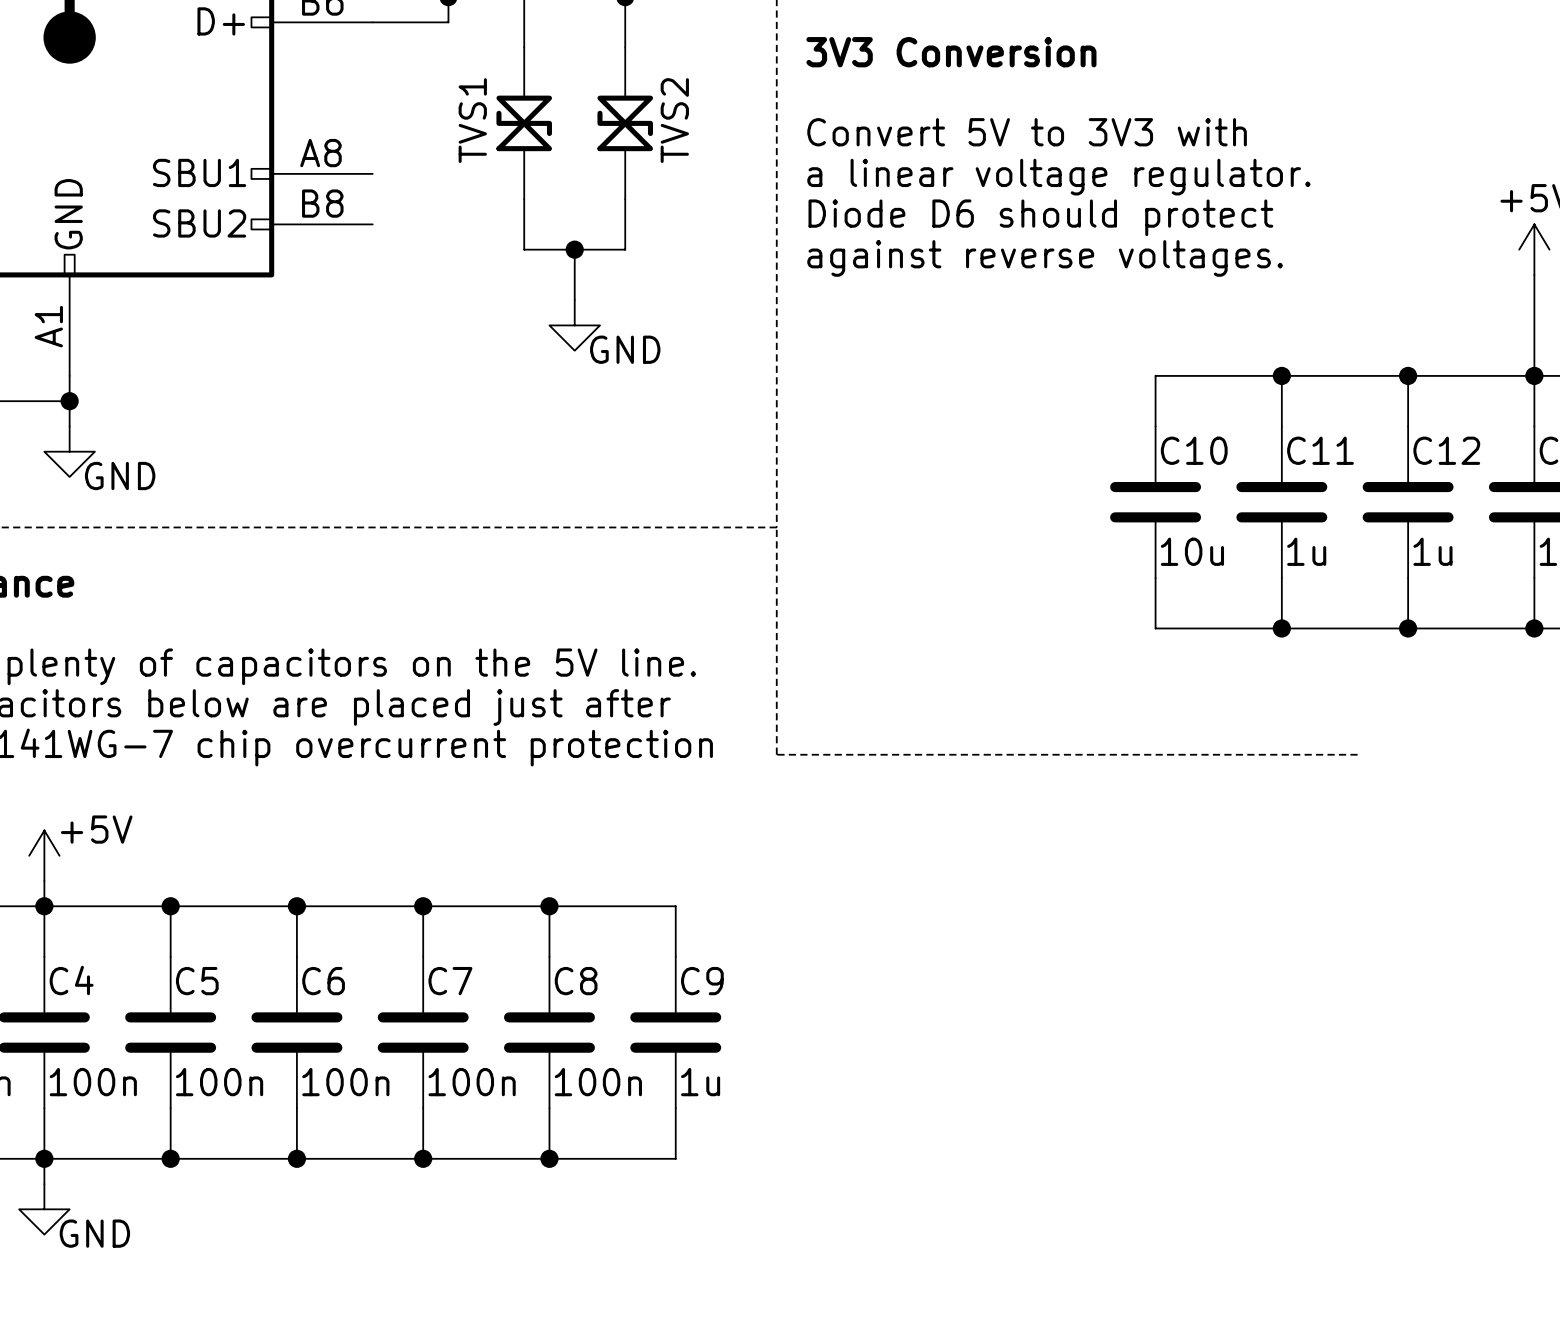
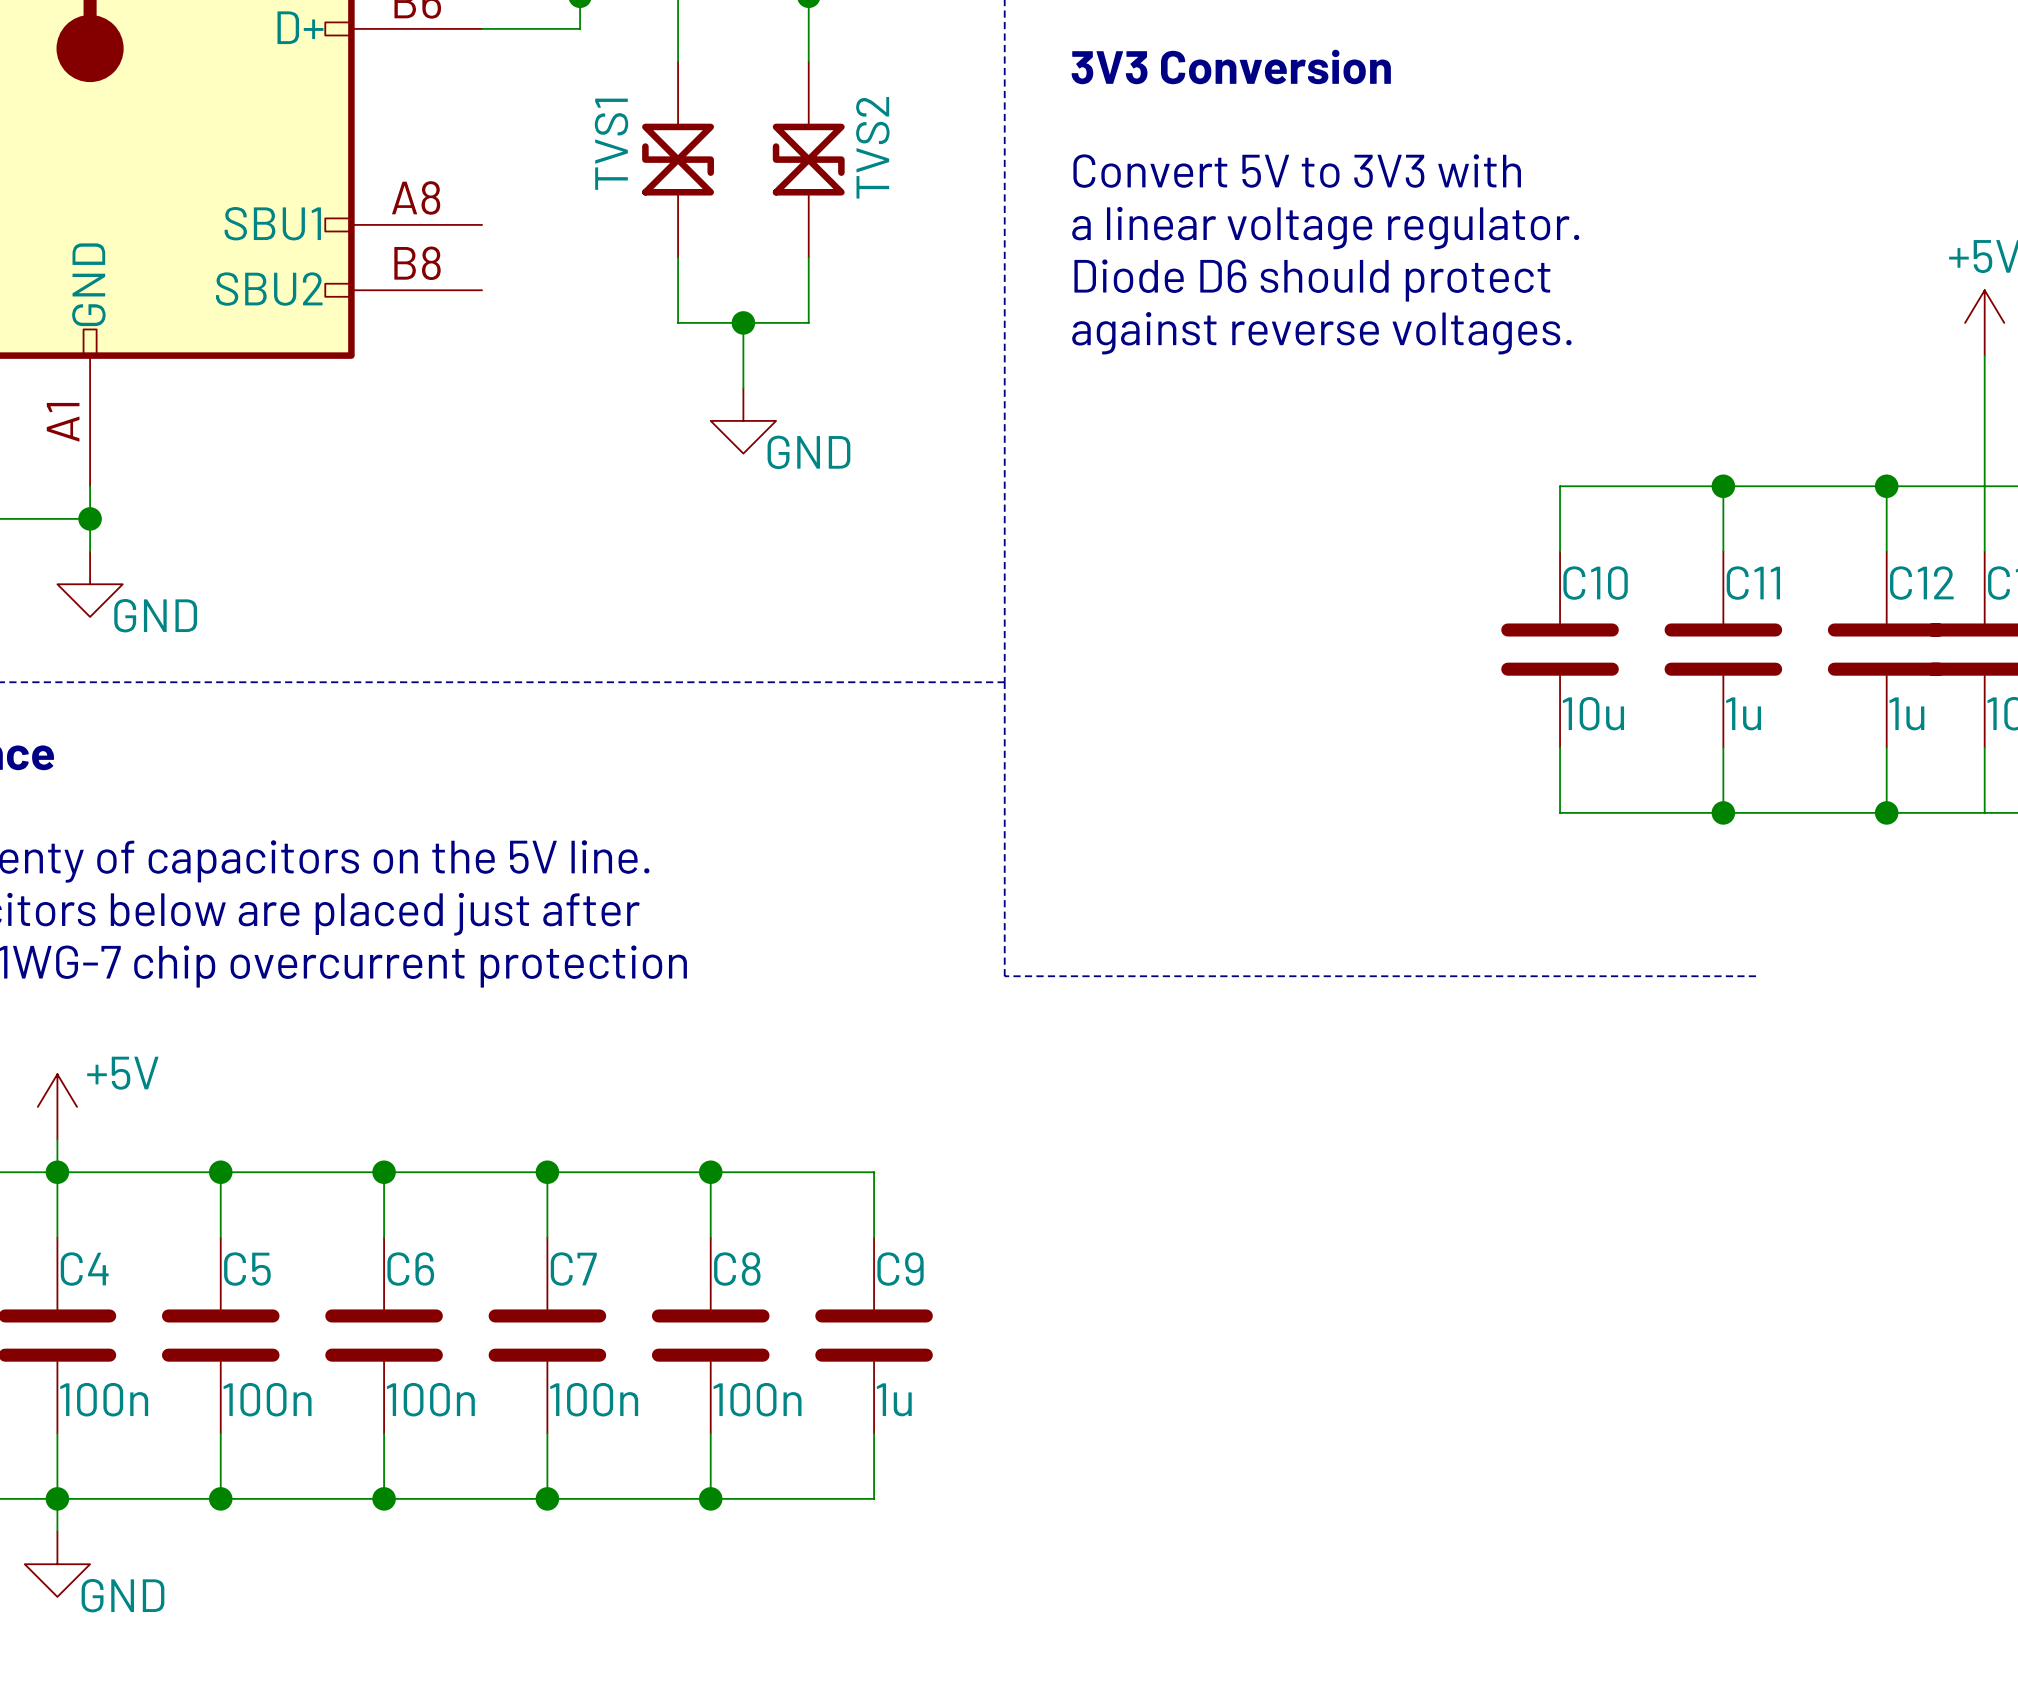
text position: 3V3 Conversion (951, 52) -> 3V3 Conversion (1231, 67)
text position: Convert 5V to 3V3 with (1027, 132) -> Convert 5V to 3V3 with (1297, 171)
text position: a linear voltage regulator. (1058, 177) -> a linear voltage regulator. (1325, 228)
text position: Diode D6 should protect (1040, 217) -> Diode D6 should protect (1312, 280)
text position: against reverse voltages. (1045, 258) -> against reverse voltages. (1321, 333)
wire: (1206, 375) (1155, 375) (1155, 426) -> (1560, 486) (1560, 551)
wire: (1281, 375) (1281, 426) -> (1723, 486) (1723, 551)
junction: (1281, 375) -> none
junction: none -> (1723, 486)
wire: (1408, 375) (1408, 426) -> (1886, 486) (1886, 551)
junction: (1408, 375) -> none
junction: none -> (1886, 486)
junction: (1534, 375) -> none
C10 position: (1155, 502) -> (1560, 649)
C11 position: (1281, 502) -> (1723, 649)
C12 position: (1408, 502) -> (1886, 649)
wire: (1155, 577) (1155, 628) (1206, 628) -> (1560, 747) (1560, 812)
wire: (1281, 577) (1281, 628) -> (1723, 747) (1723, 812)
wire: (1408, 577) (1408, 628) -> (1886, 747) (1886, 812)
junction: (1281, 628) -> none
junction: none -> (1723, 812)
junction: (1408, 628) -> none
junction: none -> (1886, 812)
junction: (1534, 628) -> none

